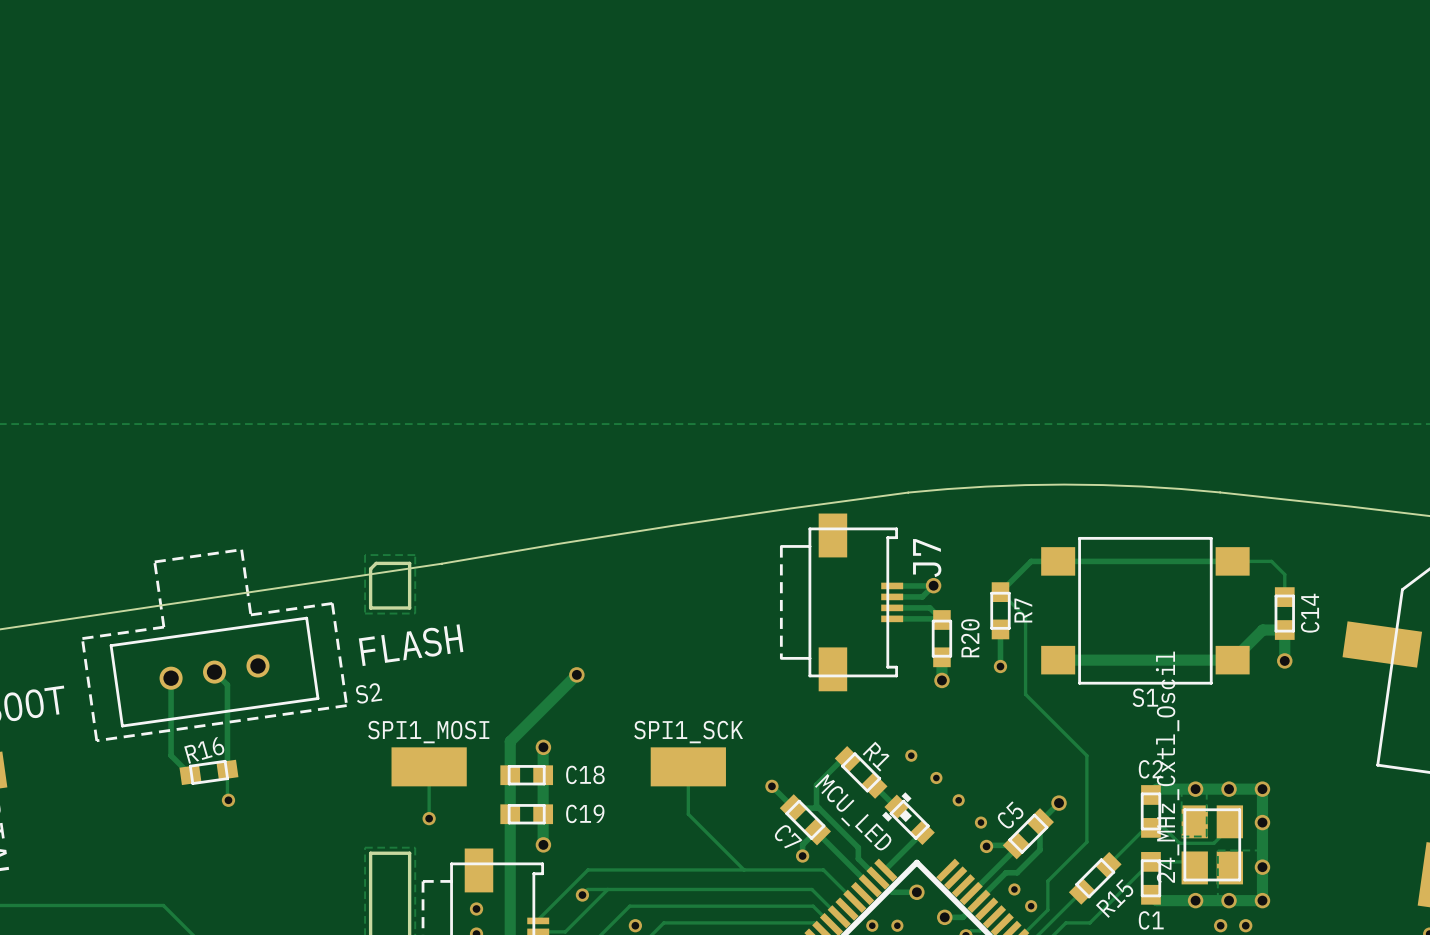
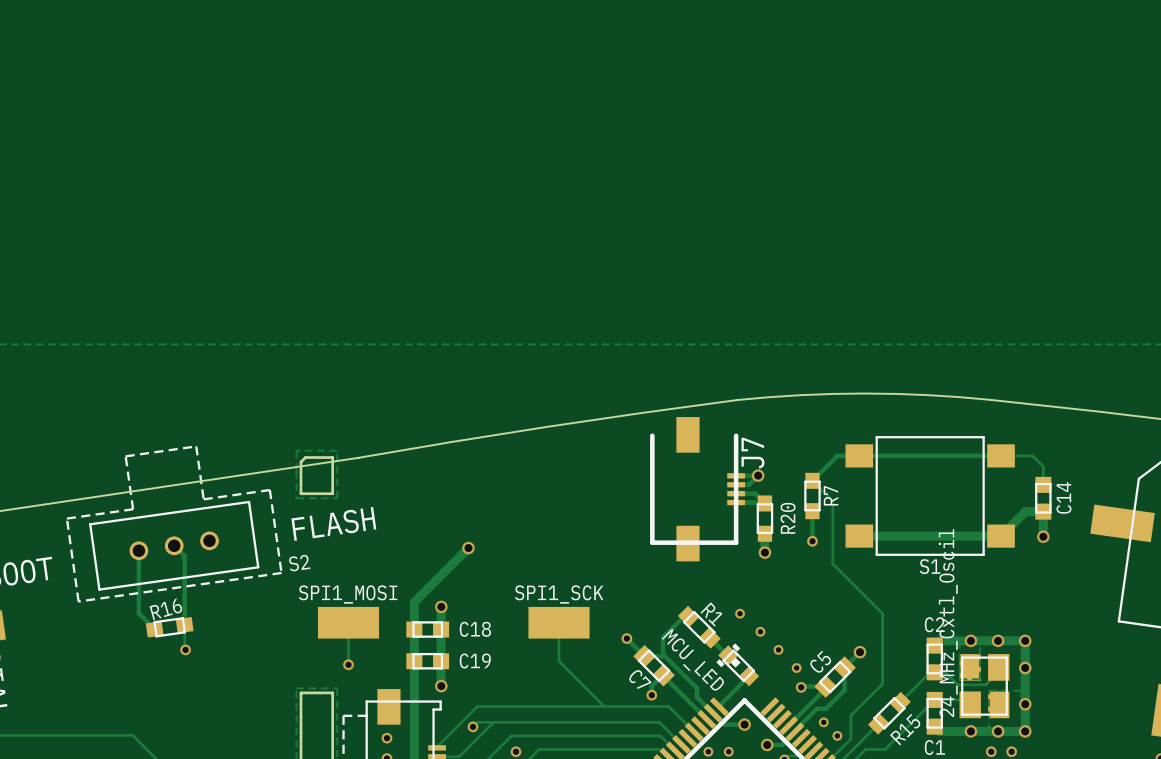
J7 footprint: [779, 513, 904, 692] -> [650, 417, 746, 562]

